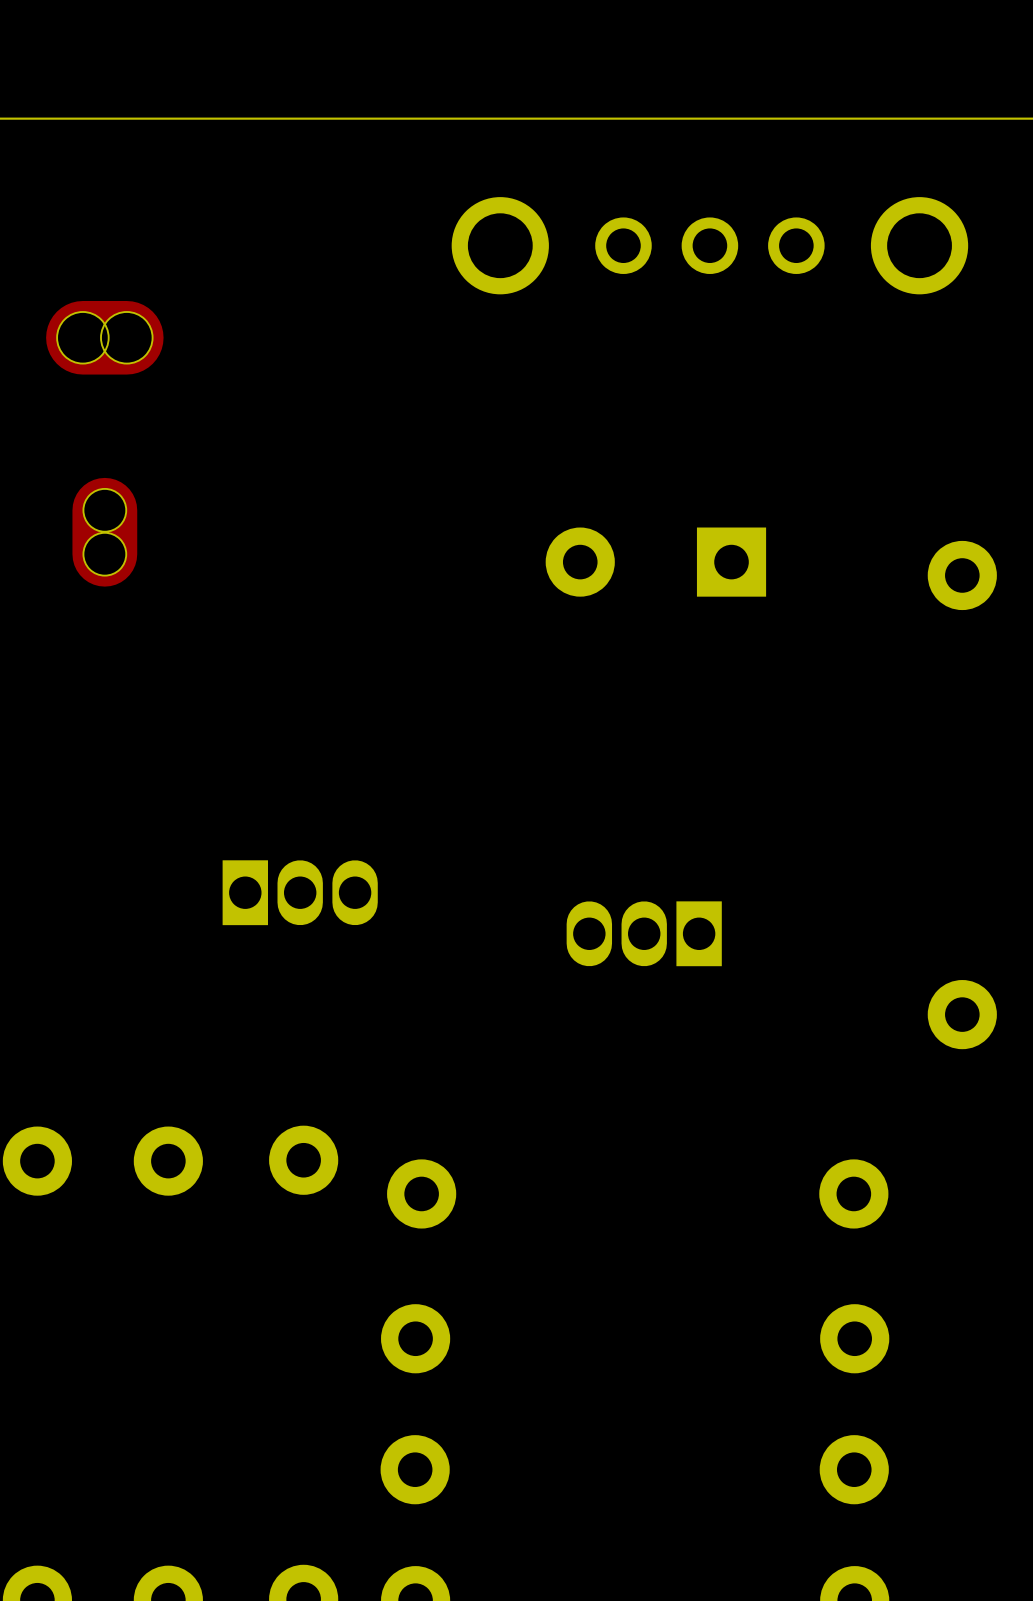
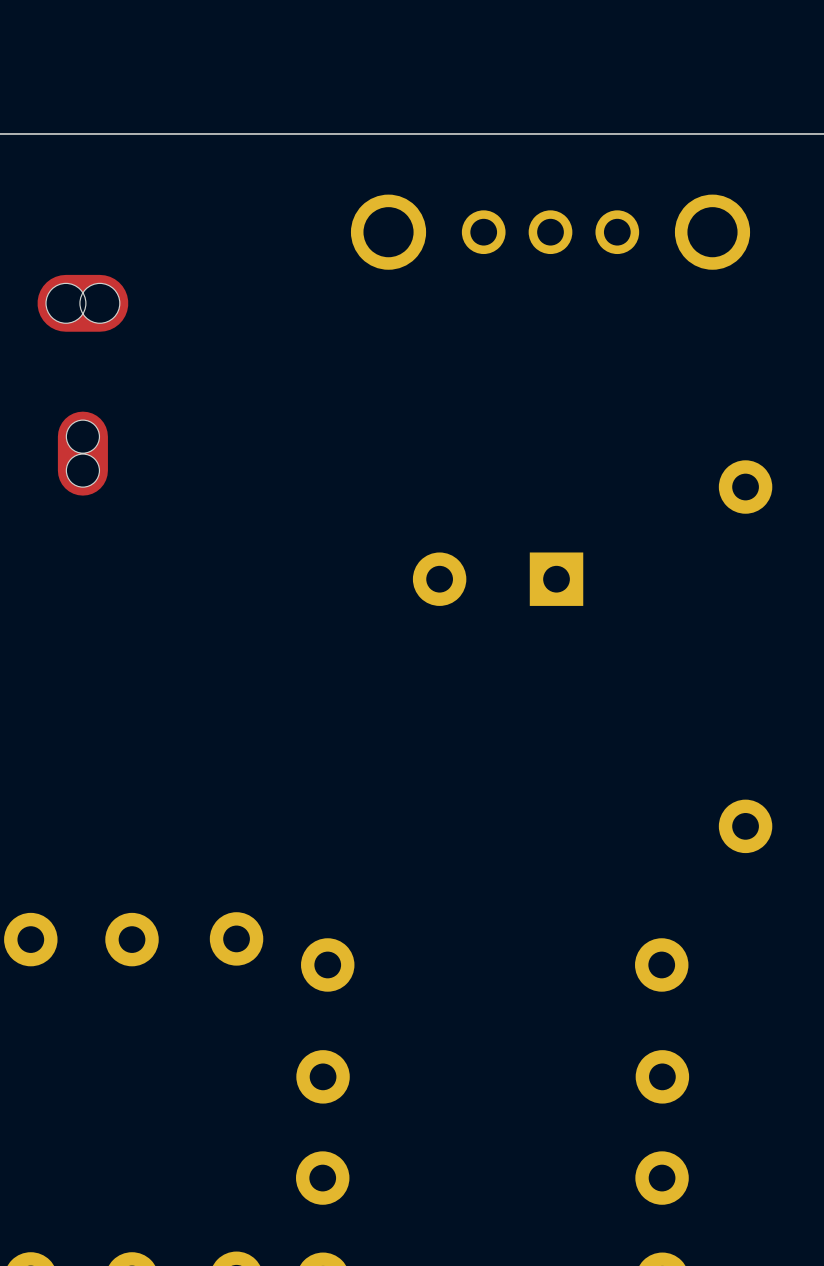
part position: (655, 562) -> (498, 579)
part: (300, 892) -> none
part: (644, 933) -> none

